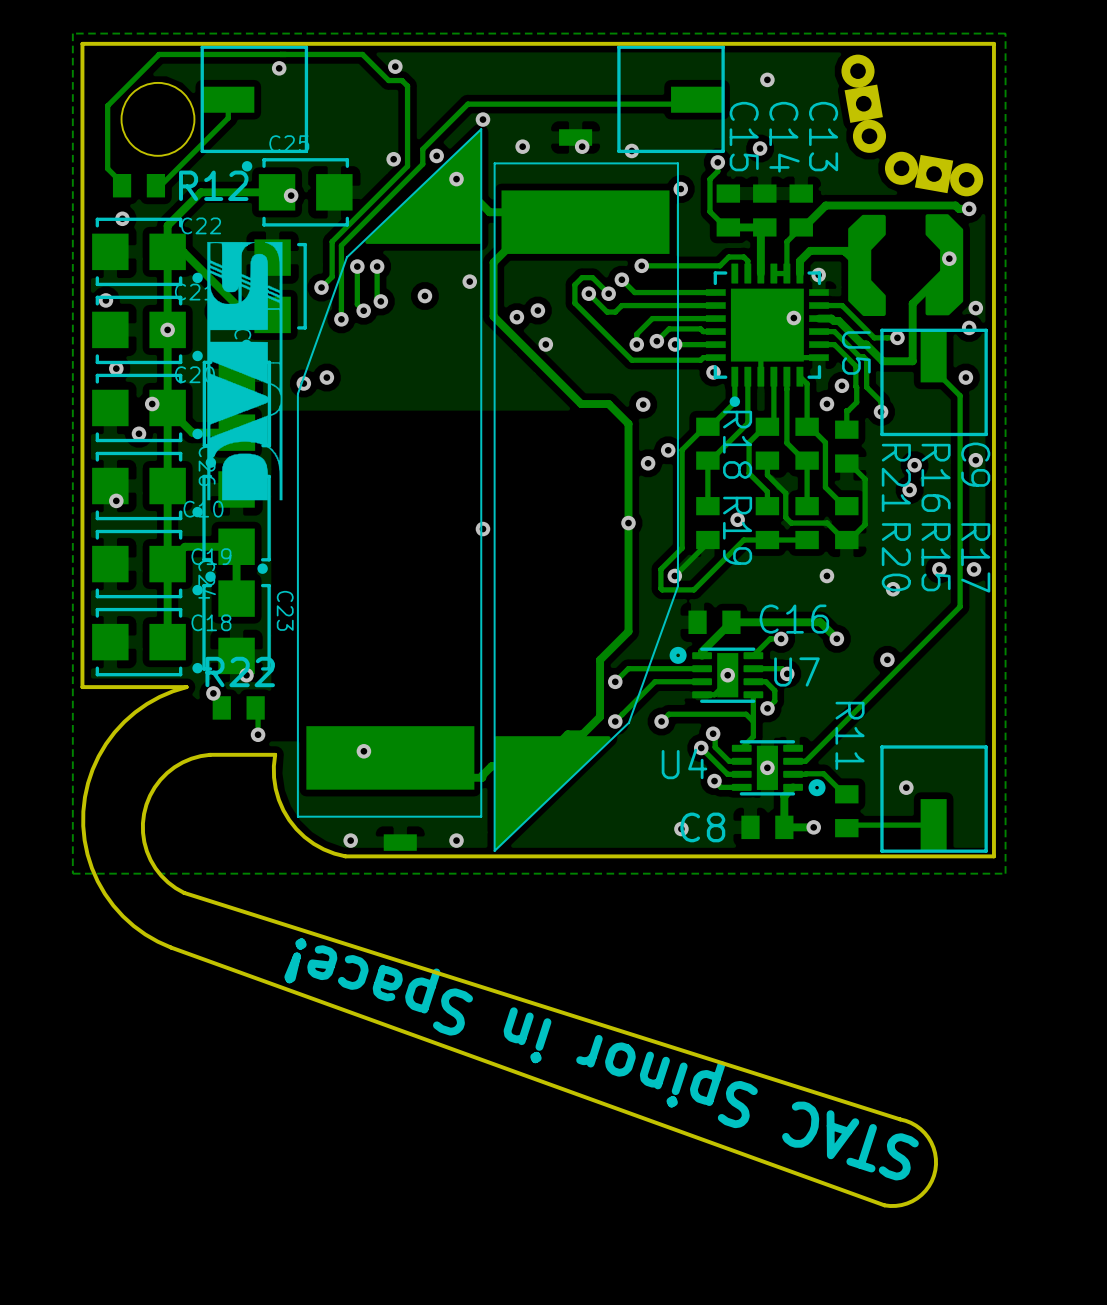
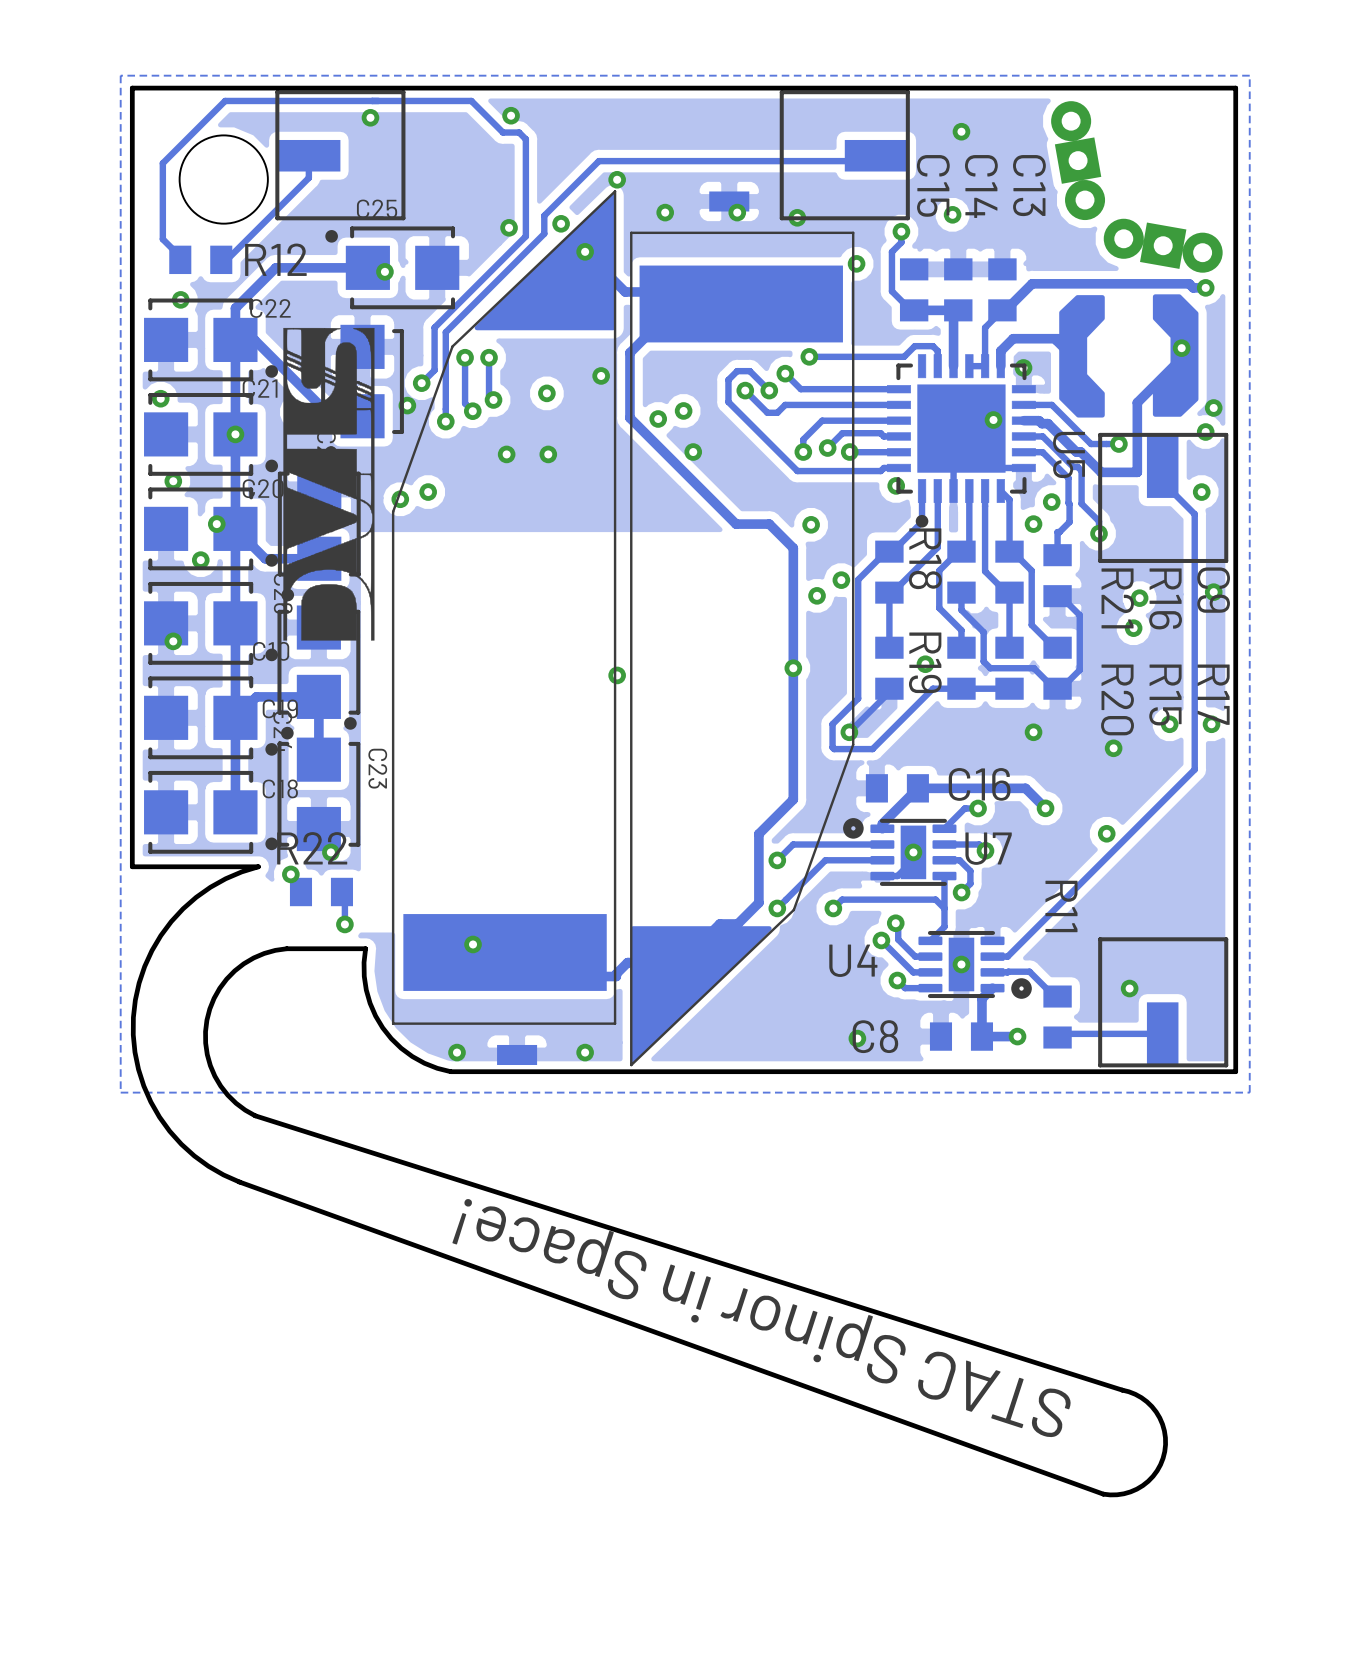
via: none -> (407, 405)
via: none -> (506, 454)
via: none -> (548, 454)

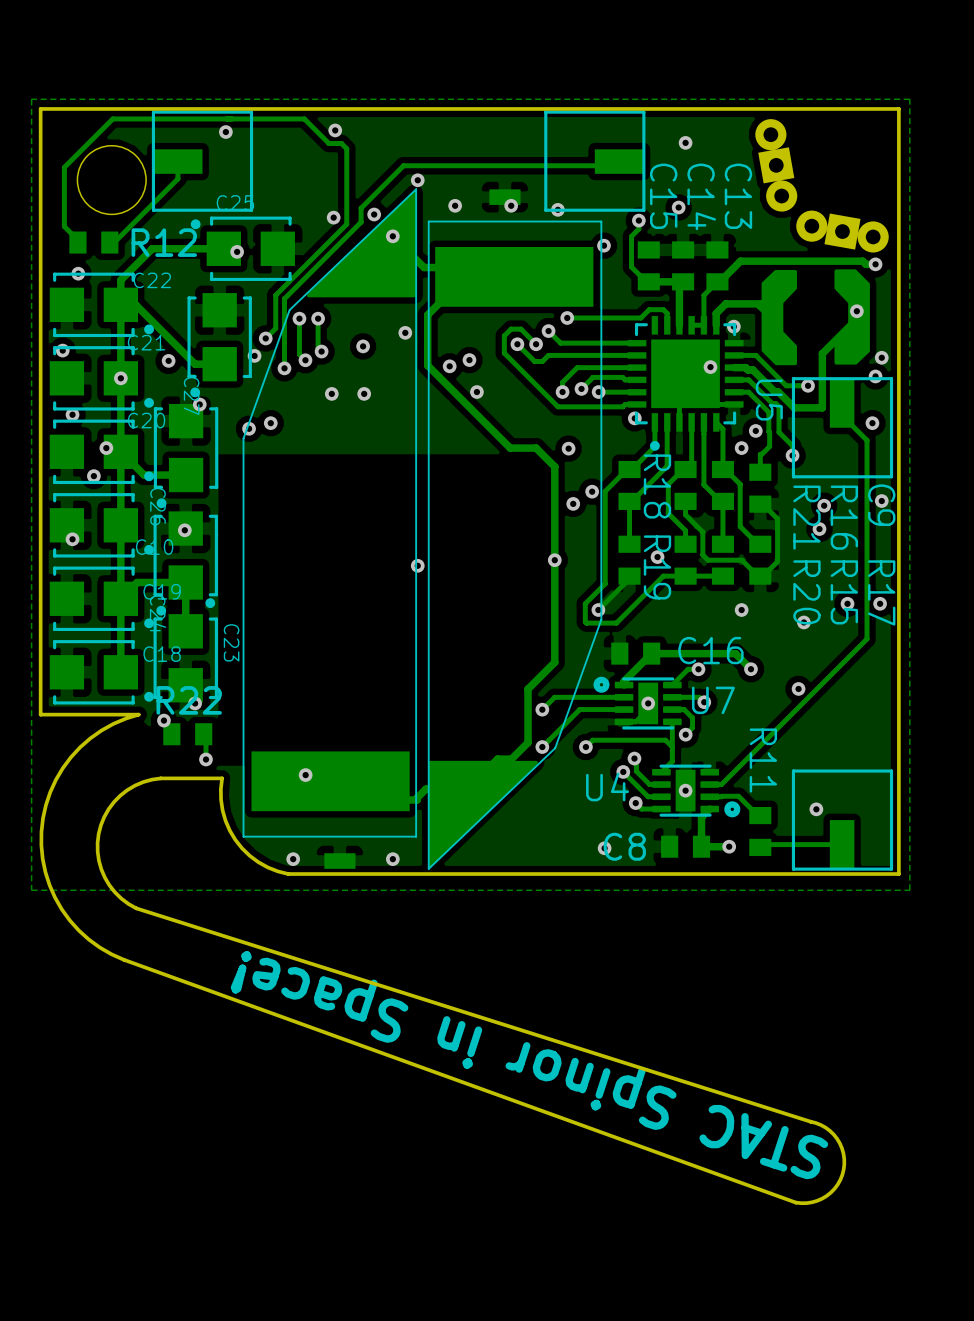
drawing: [283, 327, 375, 641] -> none

